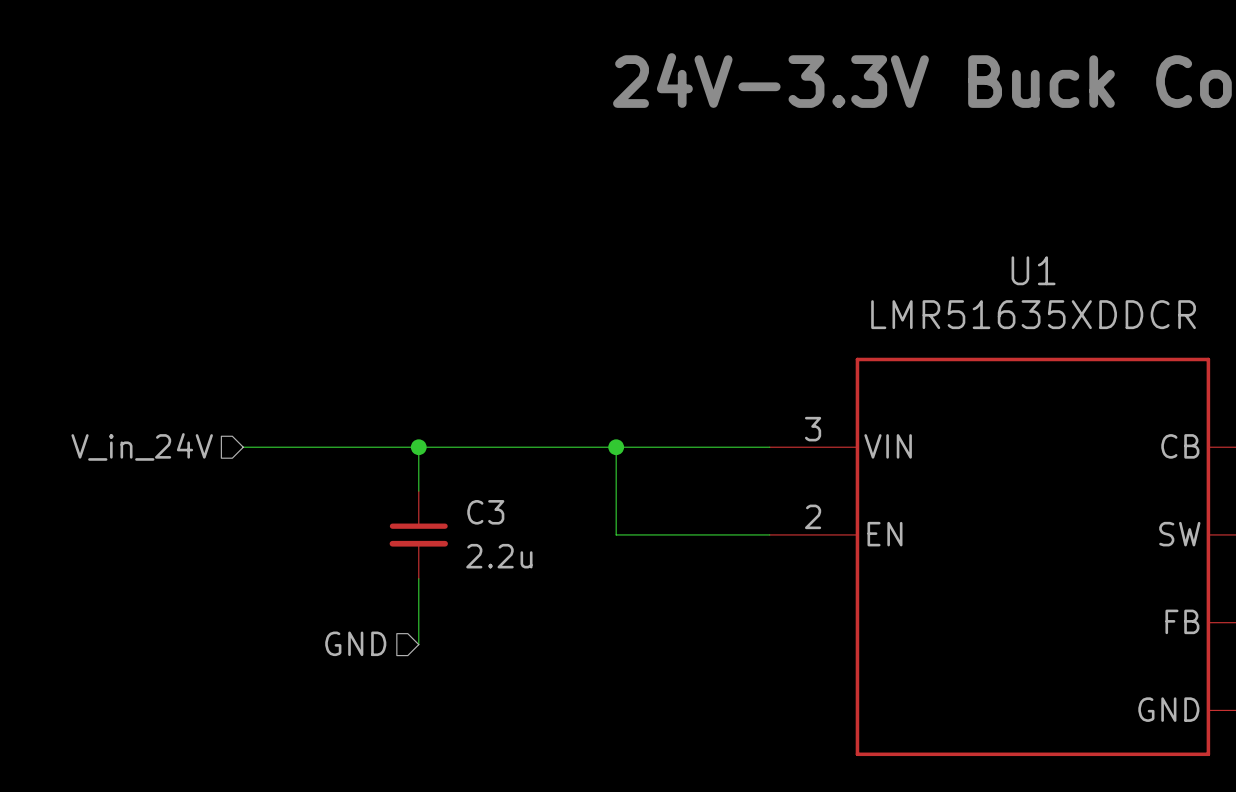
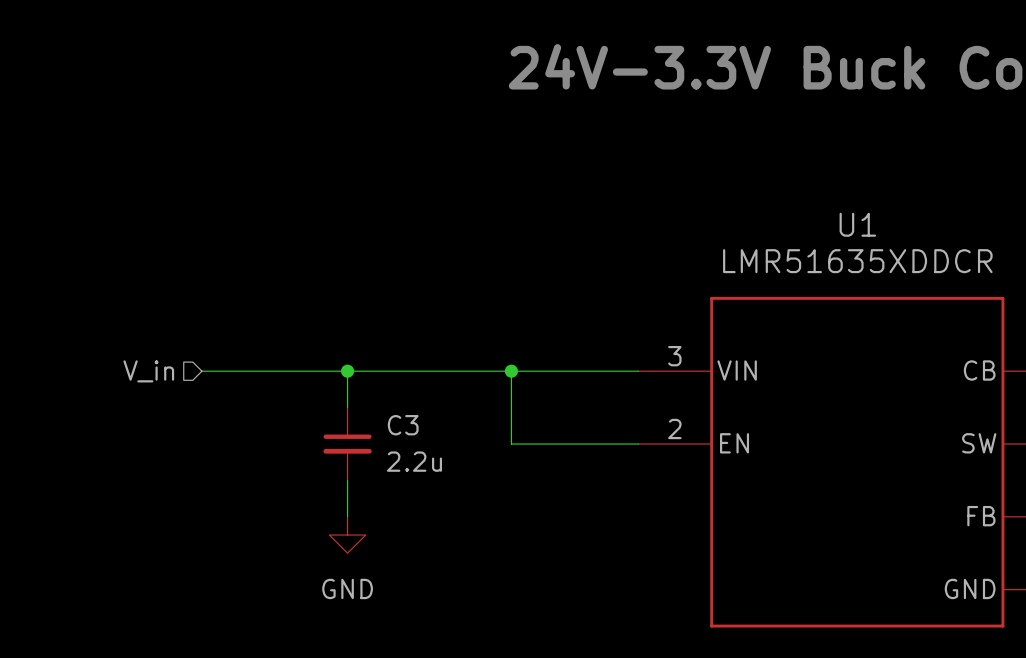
hierarchical label: V_in_24V (142, 446) -> V_in (148, 371)
hierarchical label: GND (355, 643) -> none
power symbol: none -> GND (347, 535)

